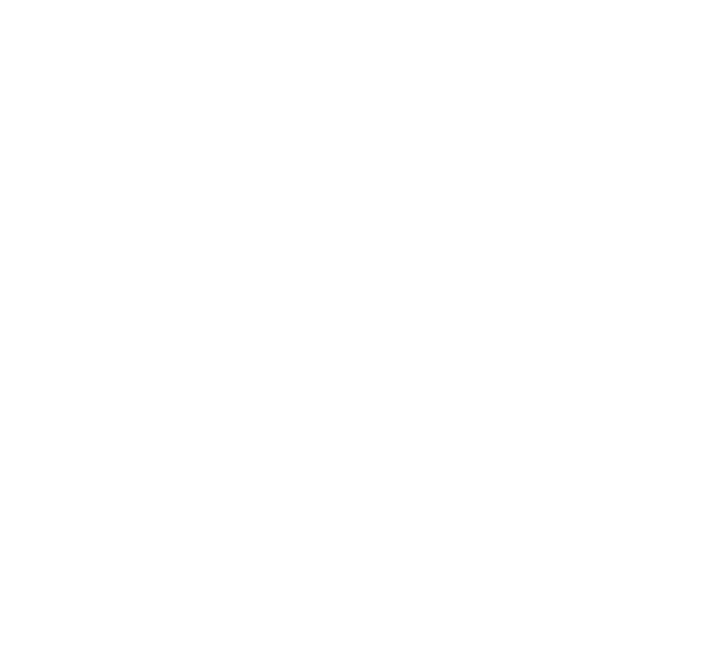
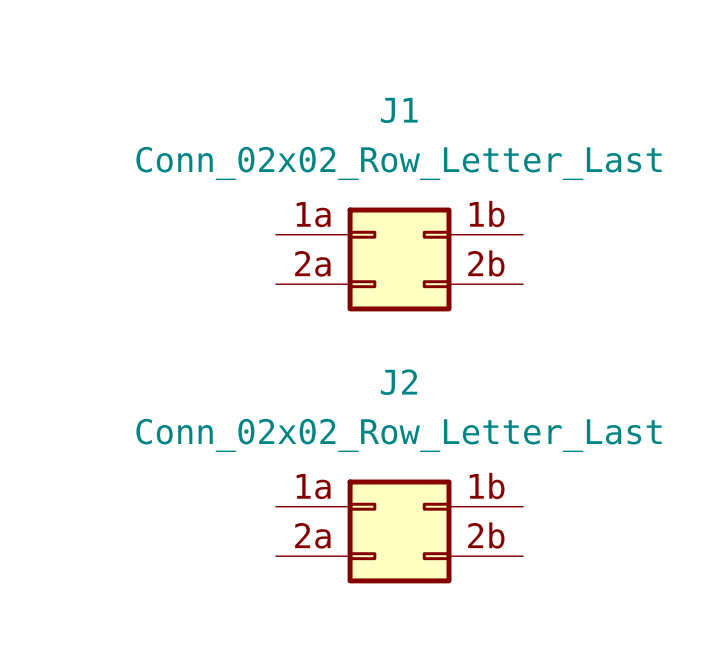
J1: none -> Conn_02x02_Row_Letter_Last (399, 259)
J2: none -> Conn_02x02_Row_Letter_Last (399, 531)

